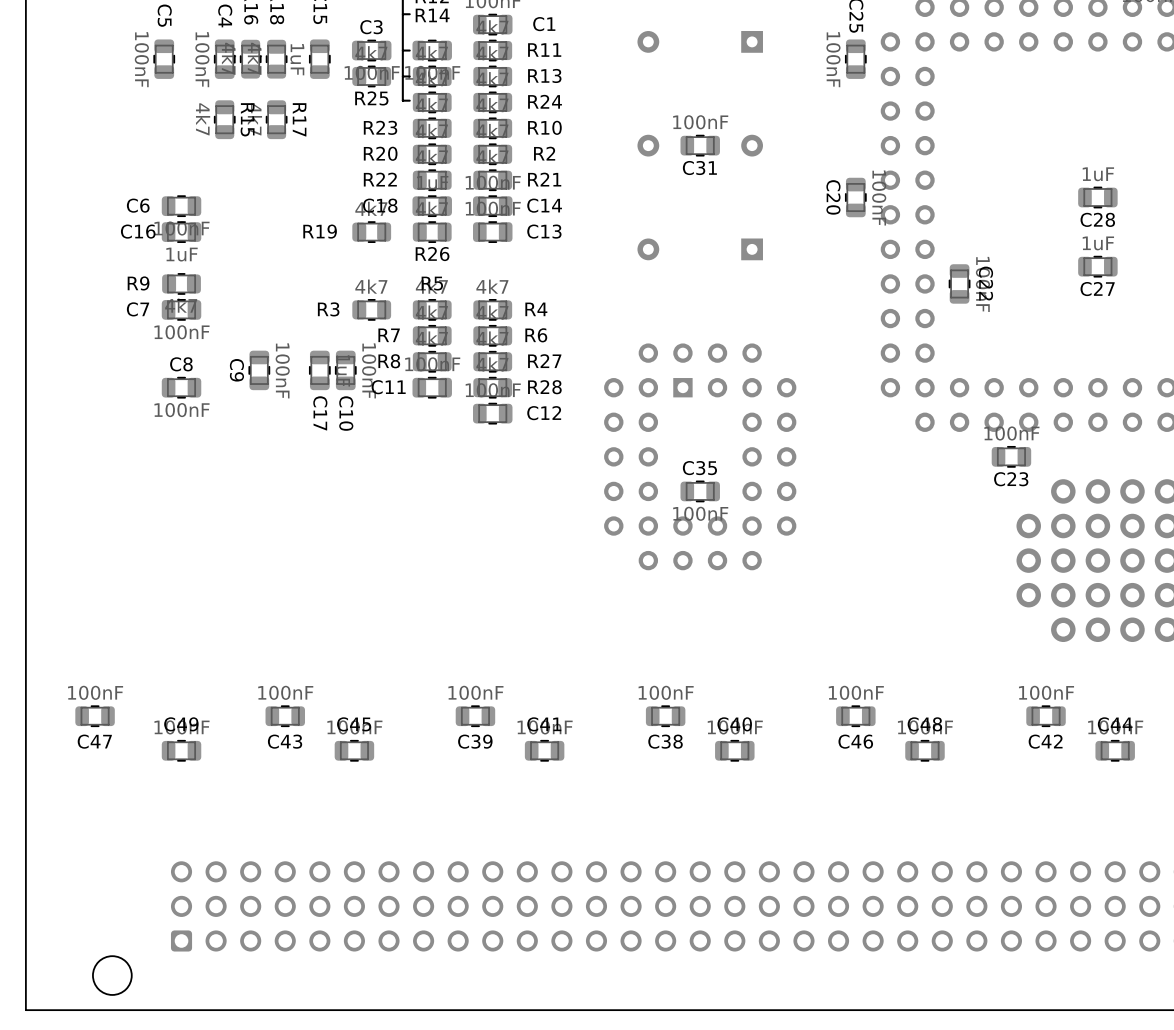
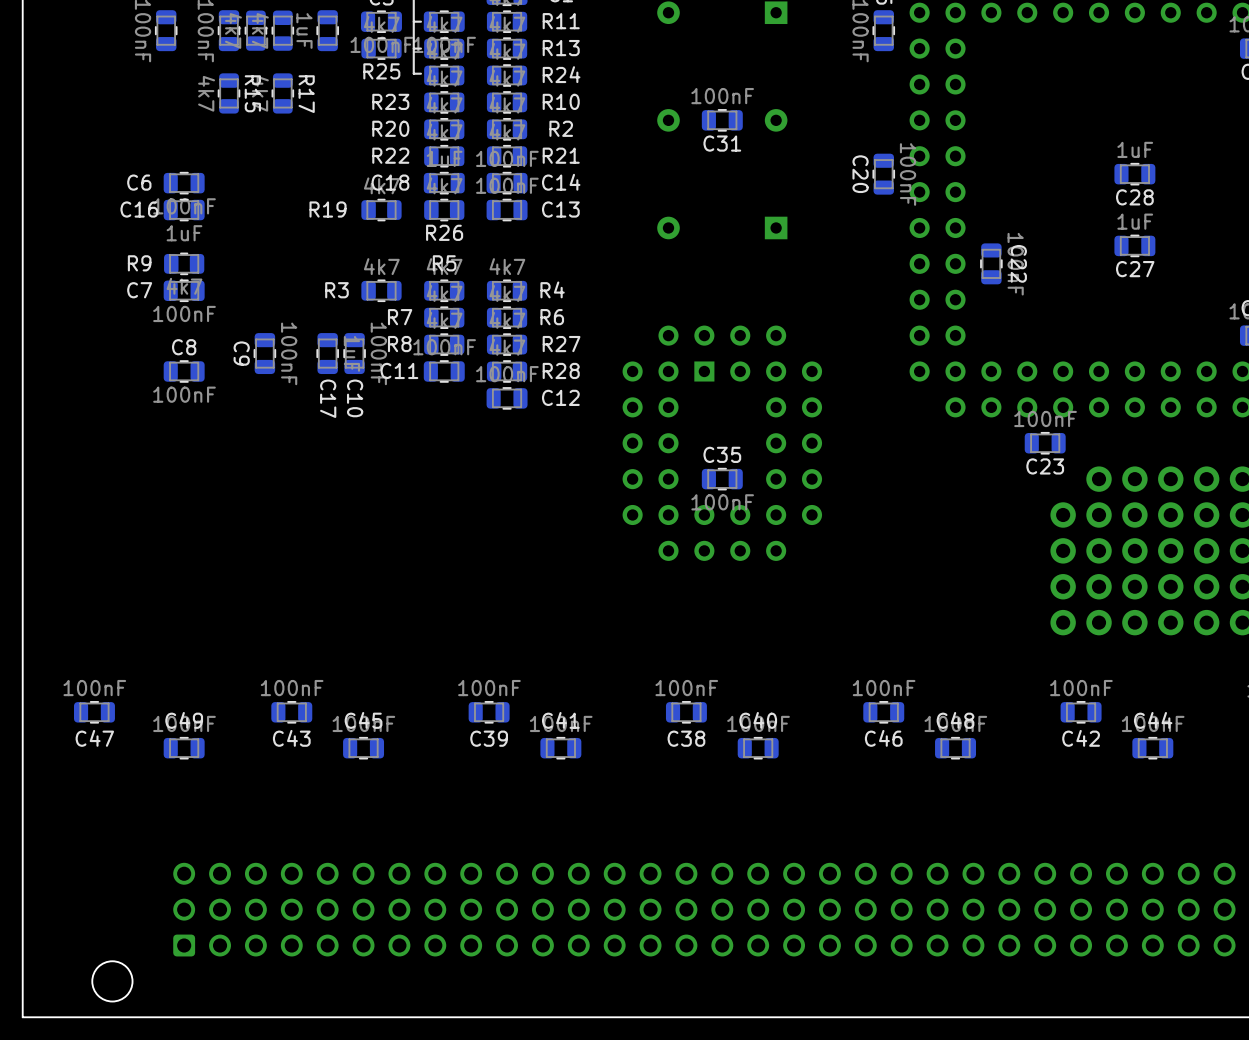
part: none -> (1063, 622)

